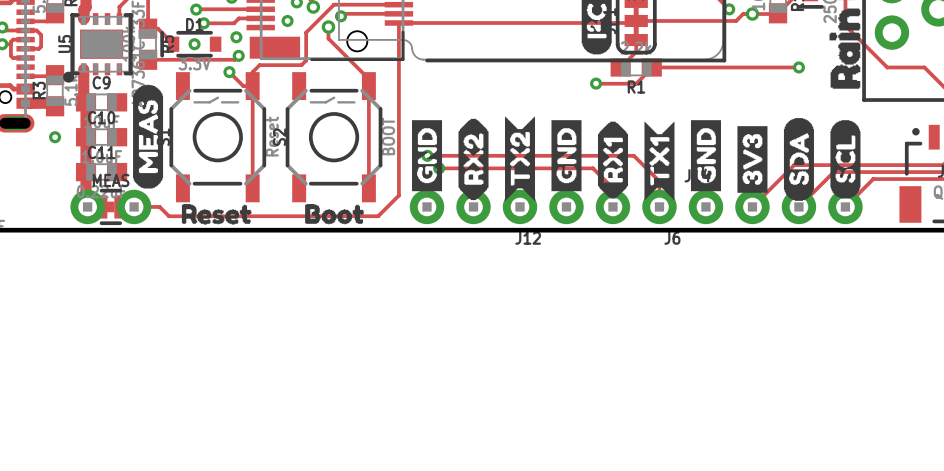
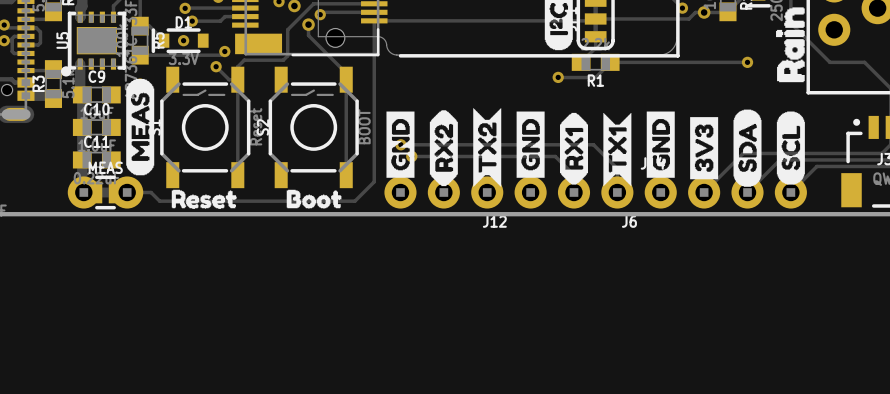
via: (287, 20) -> none
via: (236, 37) -> none
via: (55, 137) -> none

